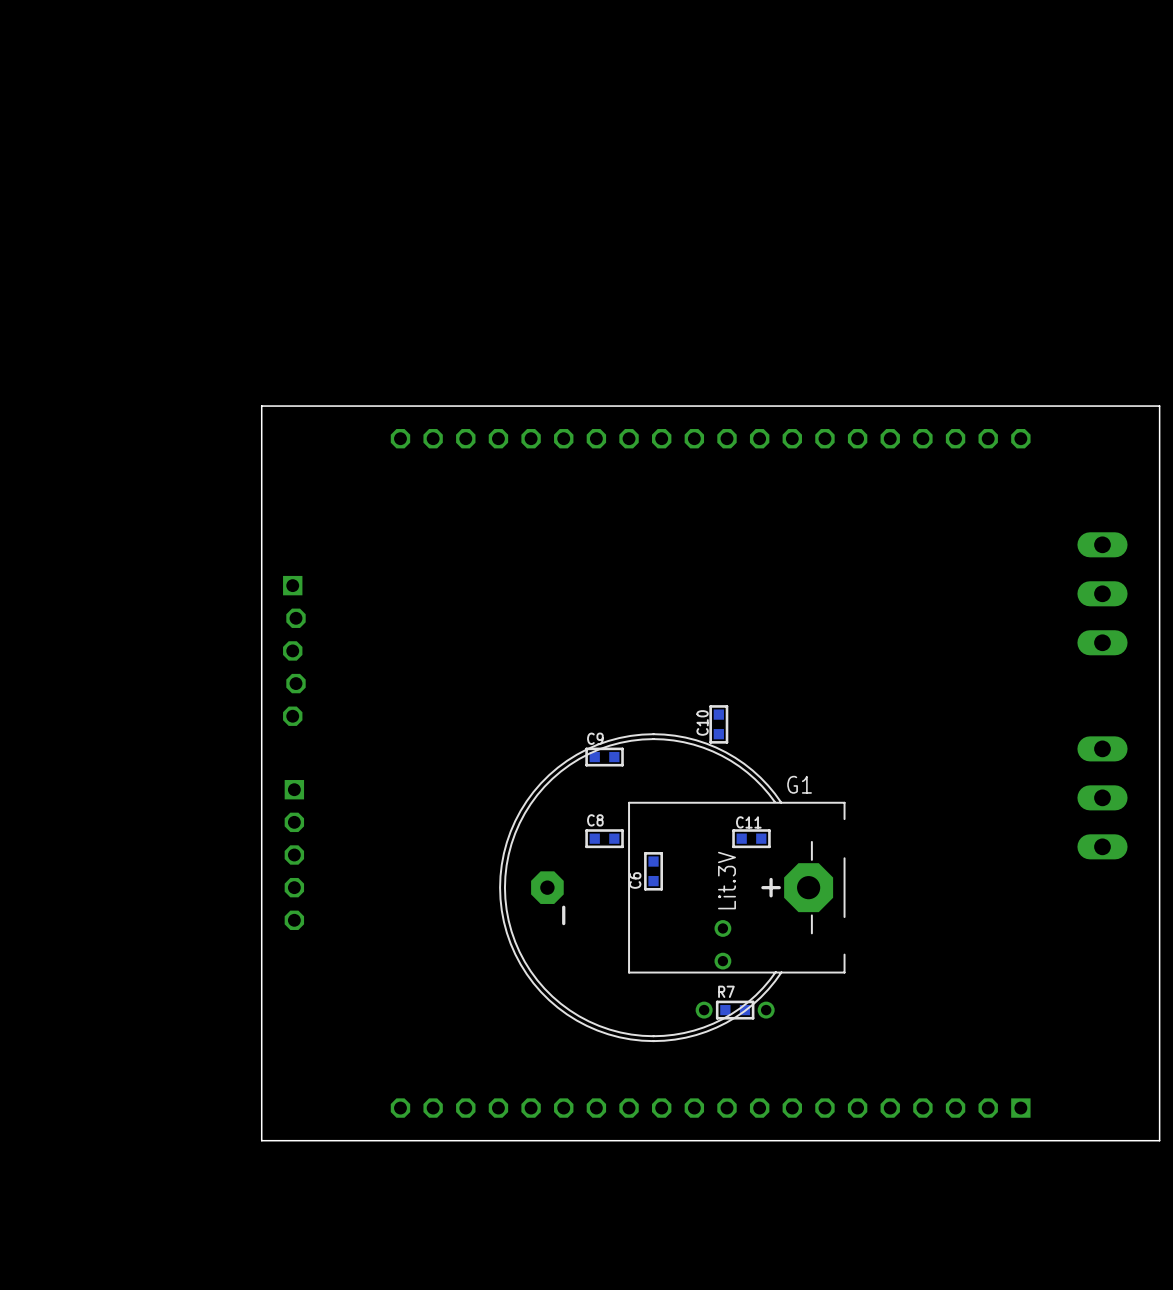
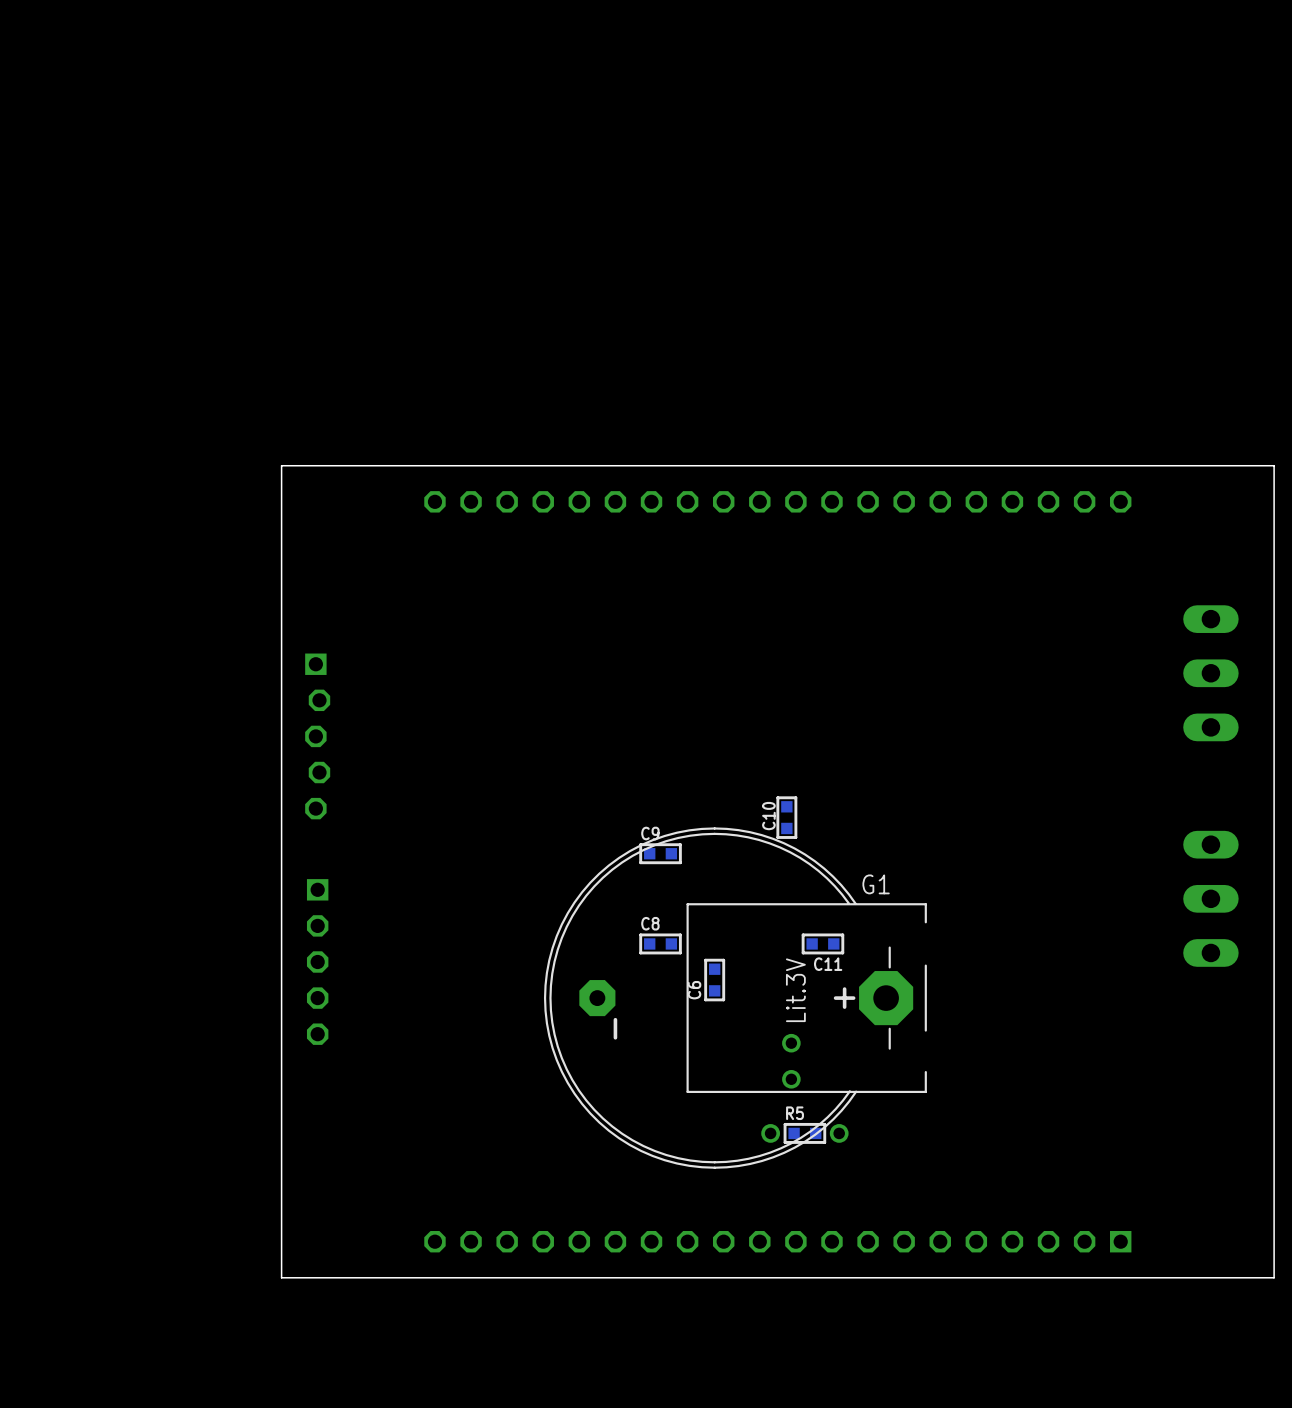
C11 name position: C11 (748, 822) -> C11 (828, 964)
R7 name: R7 (726, 991) -> R5 (795, 1113)

